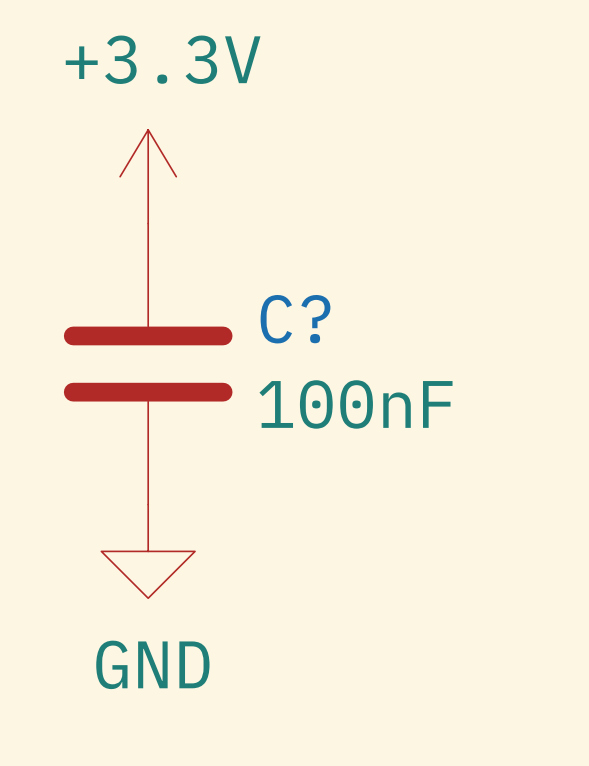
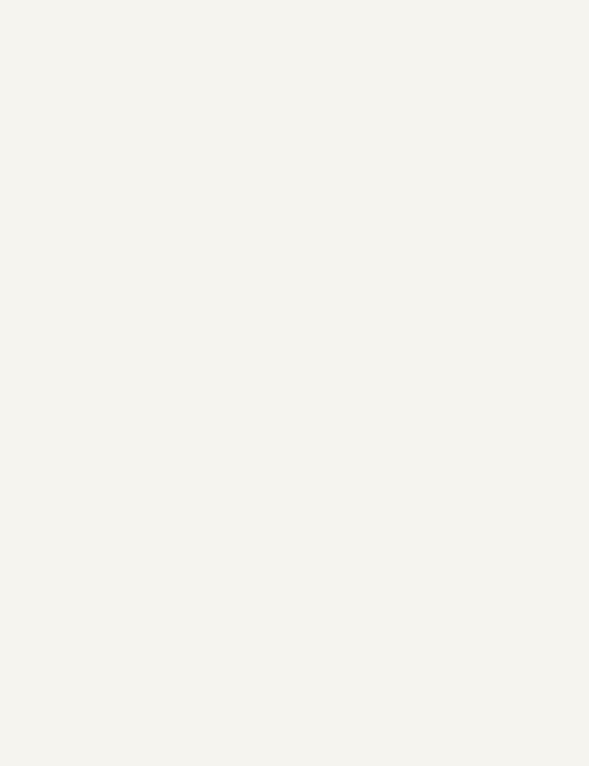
power symbol: +3.3V (148, 176) -> none
C?: 100nF (148, 364) -> none
power symbol: GND (148, 551) -> none

